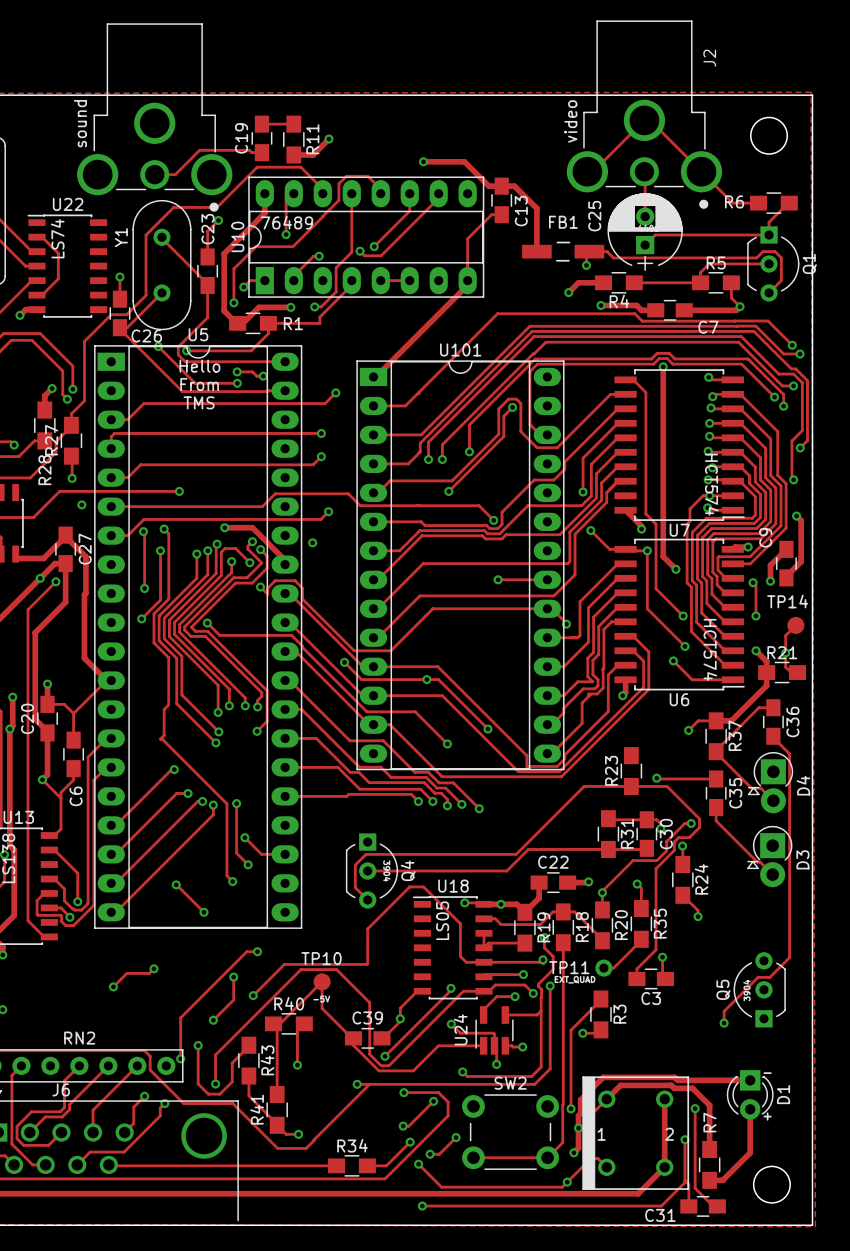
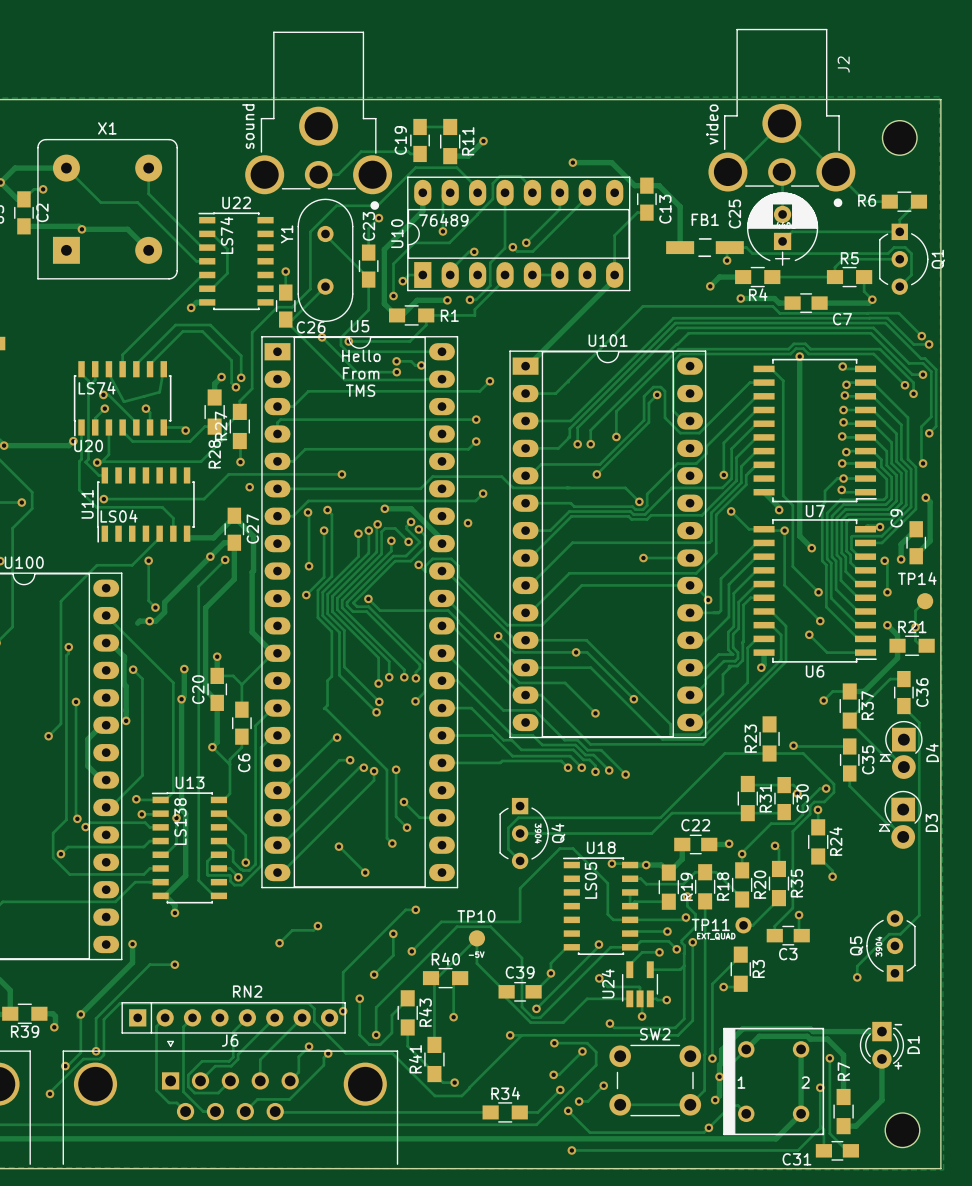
text: HCT574 (711, 484) -> none
text: HCT574 (710, 649) -> none

